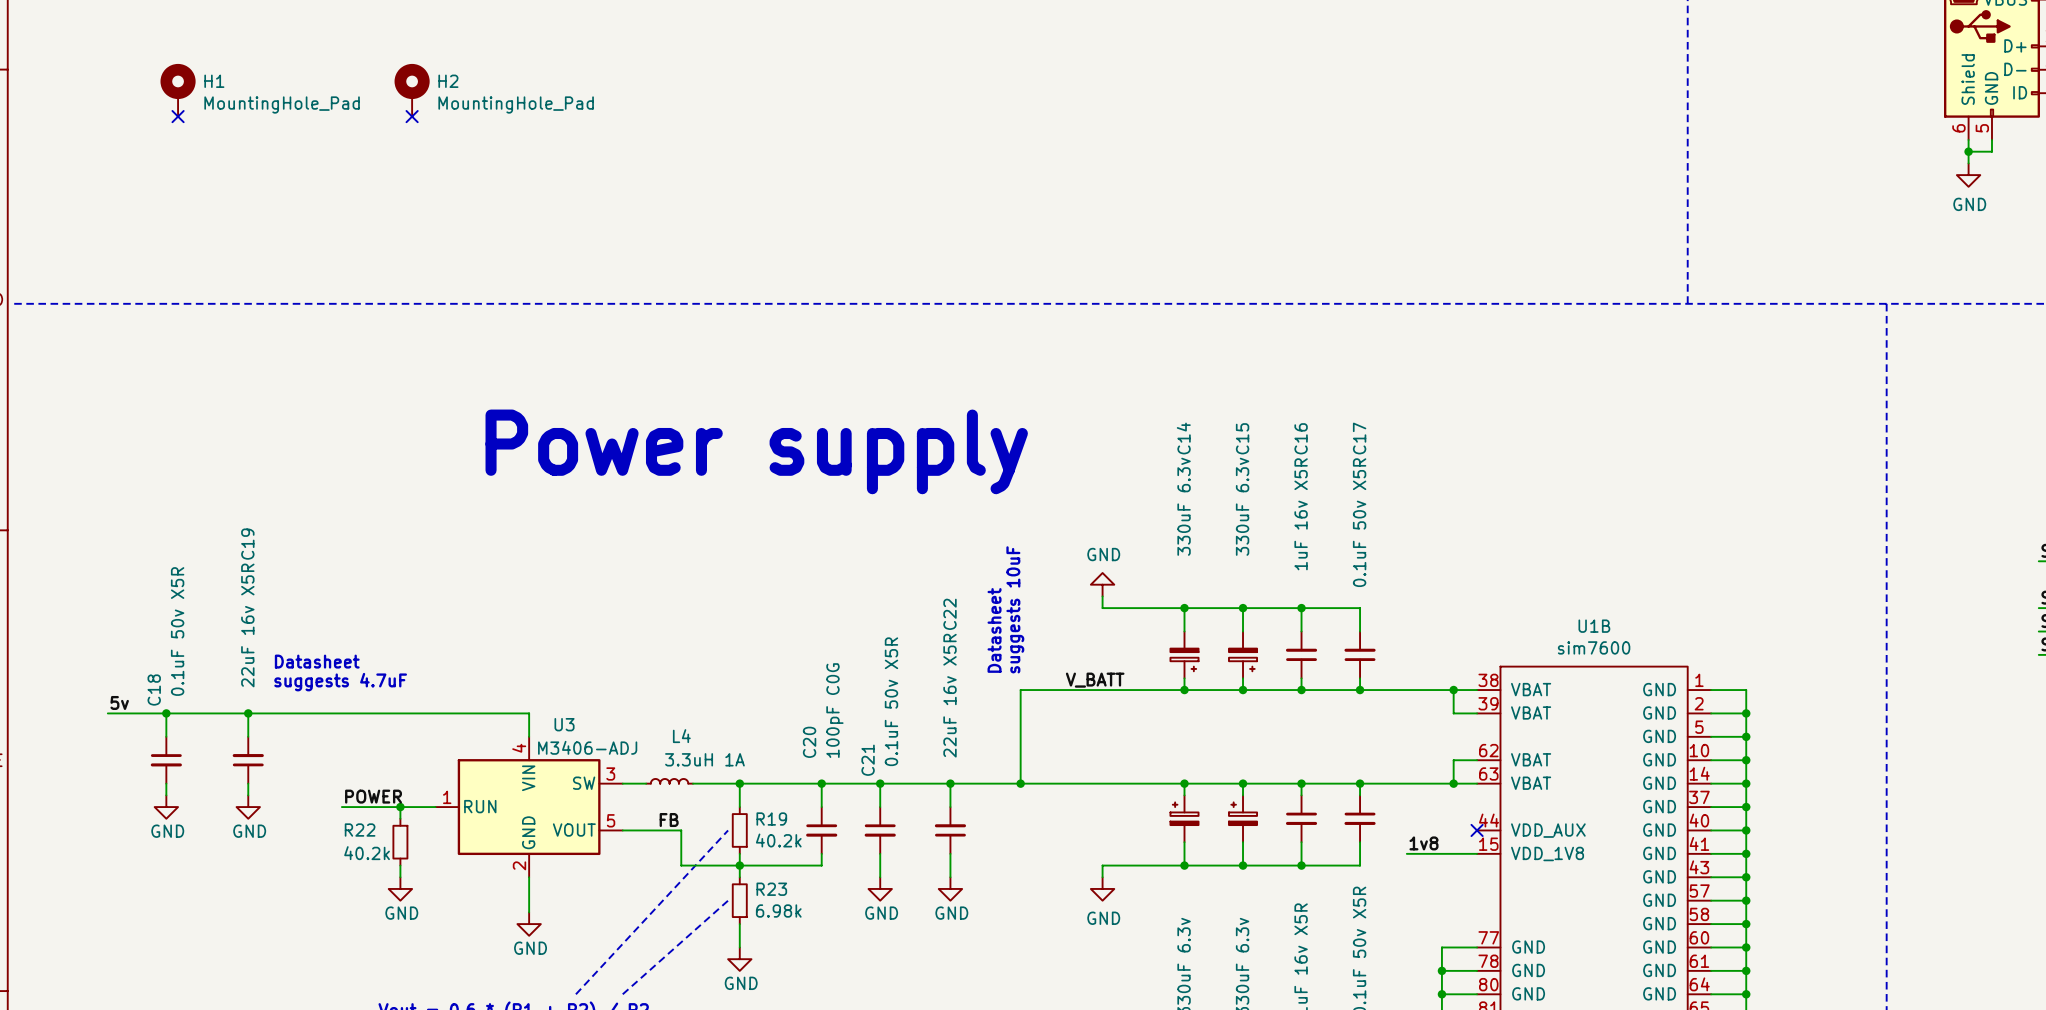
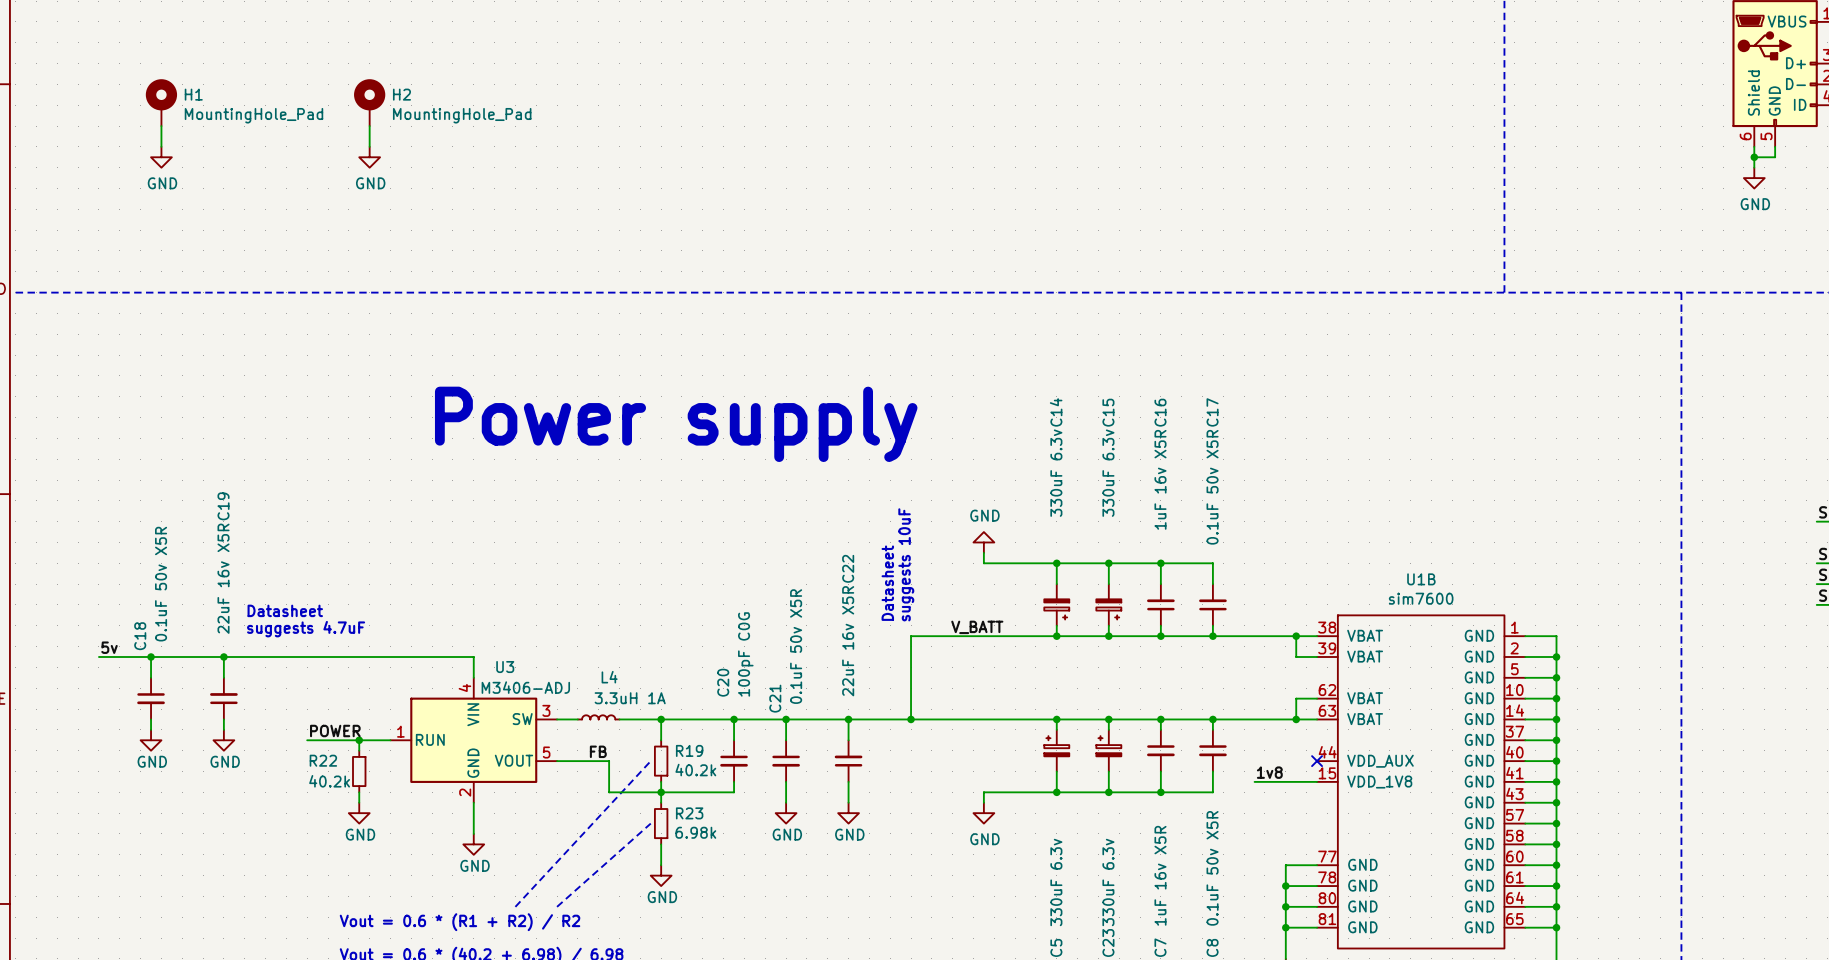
wire: none -> (161, 126) (161, 146)
no-connect mark: (178, 116) -> none
wire: none -> (369, 126) (369, 146)
no-connect mark: (412, 116) -> none
power symbol: none -> GND (161, 157)
power symbol: none -> GND (369, 157)

